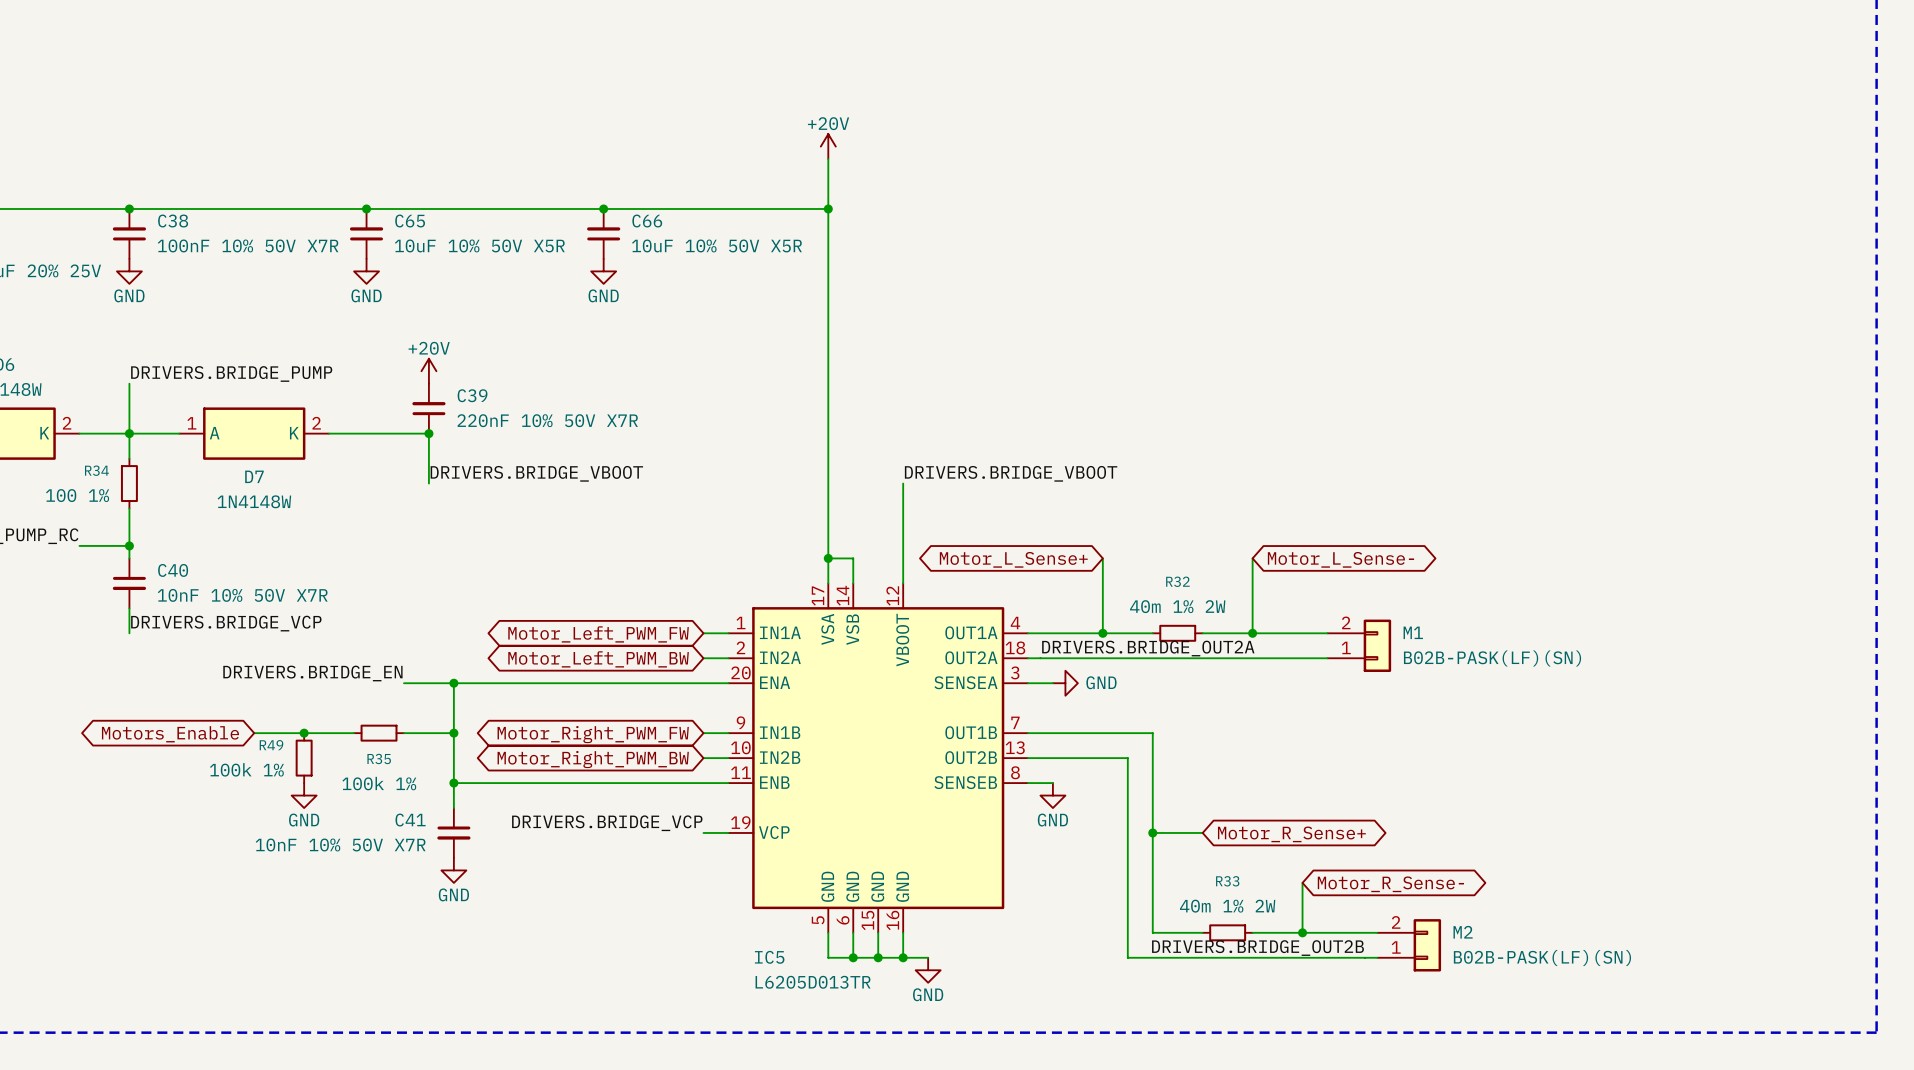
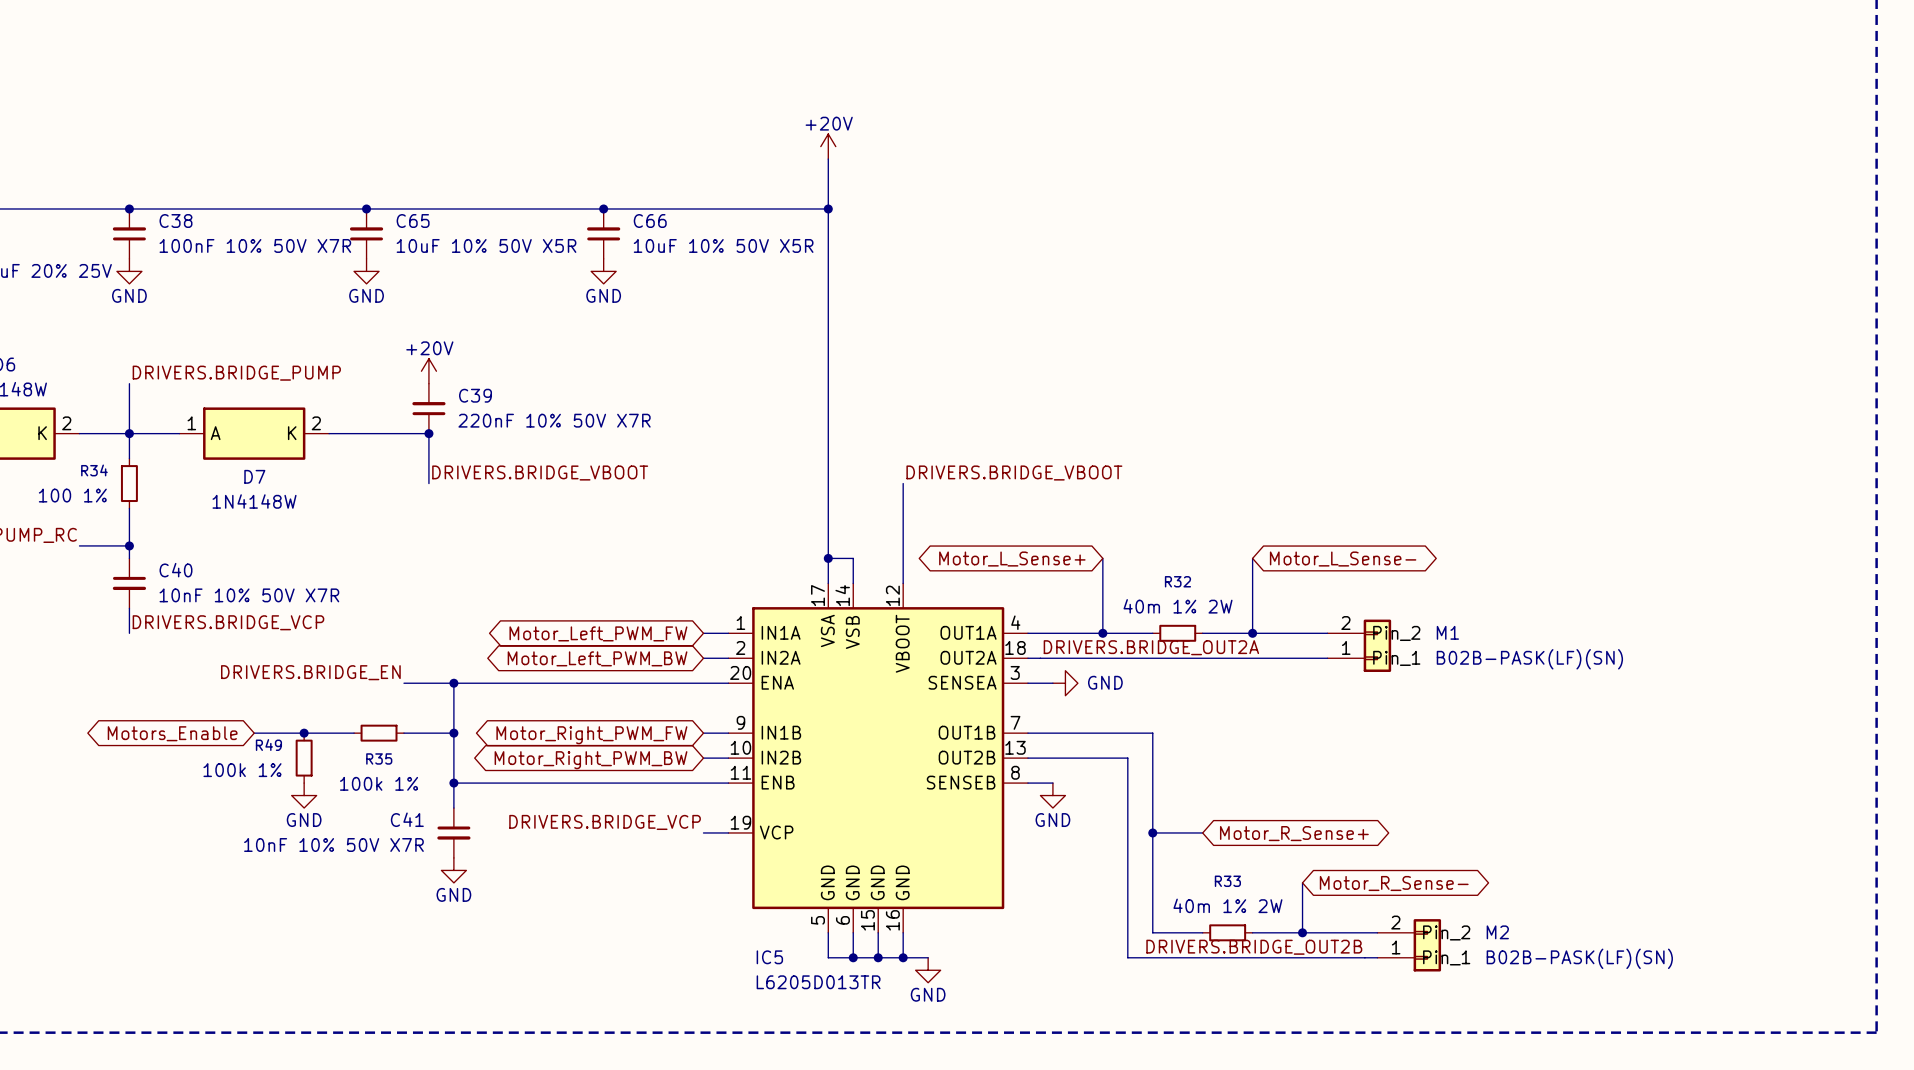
M1 name position: M1 (1413, 632) -> M1 (1447, 632)
M1 pin name: none -> Pin_2 (1396, 633)
M1 pin name: none -> Pin_1 (1396, 658)
M1 value position: B02B-PASK(LF)(SN) (1492, 658) -> B02B-PASK(LF)(SN) (1529, 659)
M2 name position: M2 (1463, 932) -> M2 (1497, 932)
M2 pin name: none -> Pin_2 (1446, 932)
M2 value position: B02B-PASK(LF)(SN) (1542, 957) -> B02B-PASK(LF)(SN) (1579, 958)
M2 pin name: none -> Pin_1 (1446, 957)

